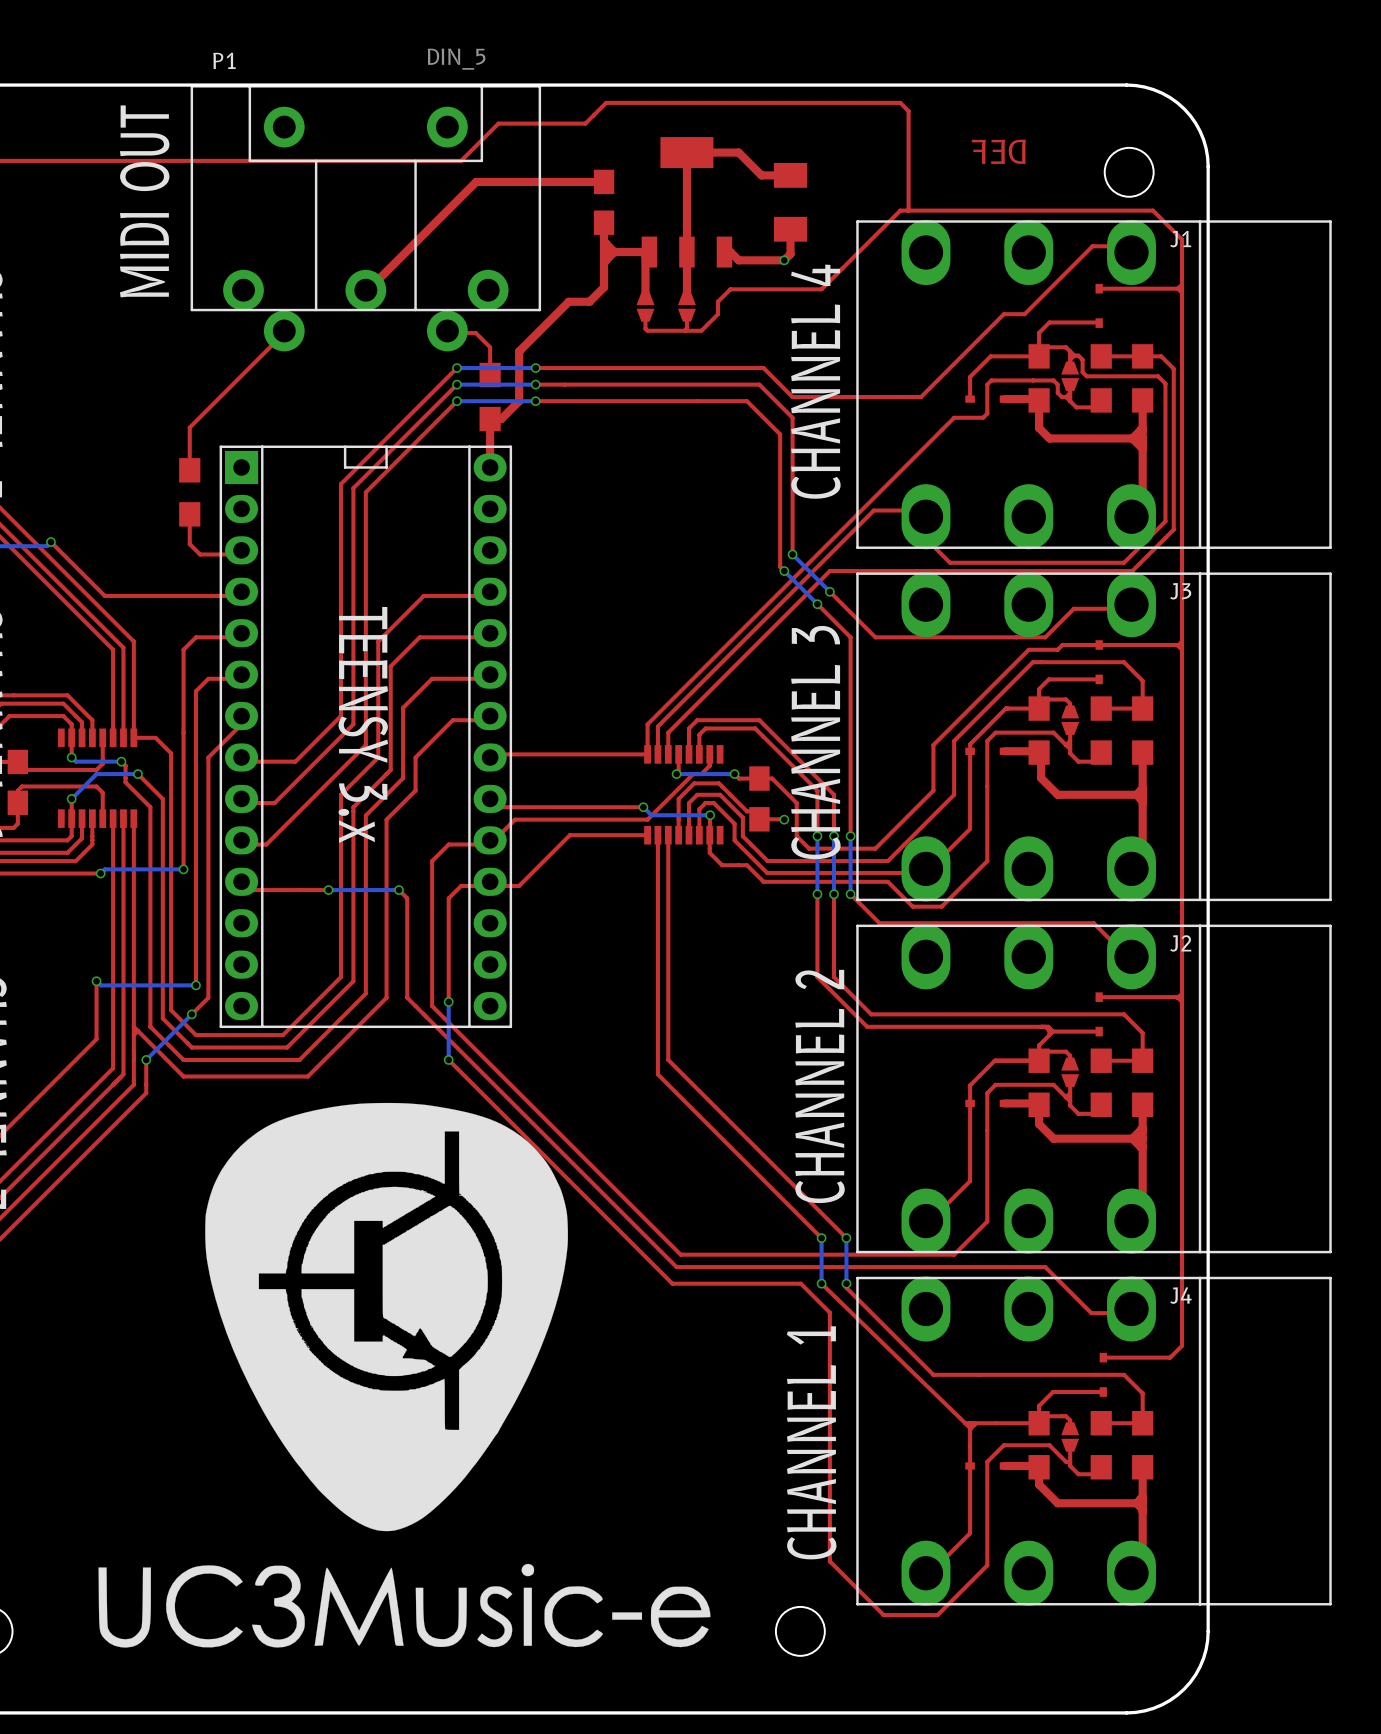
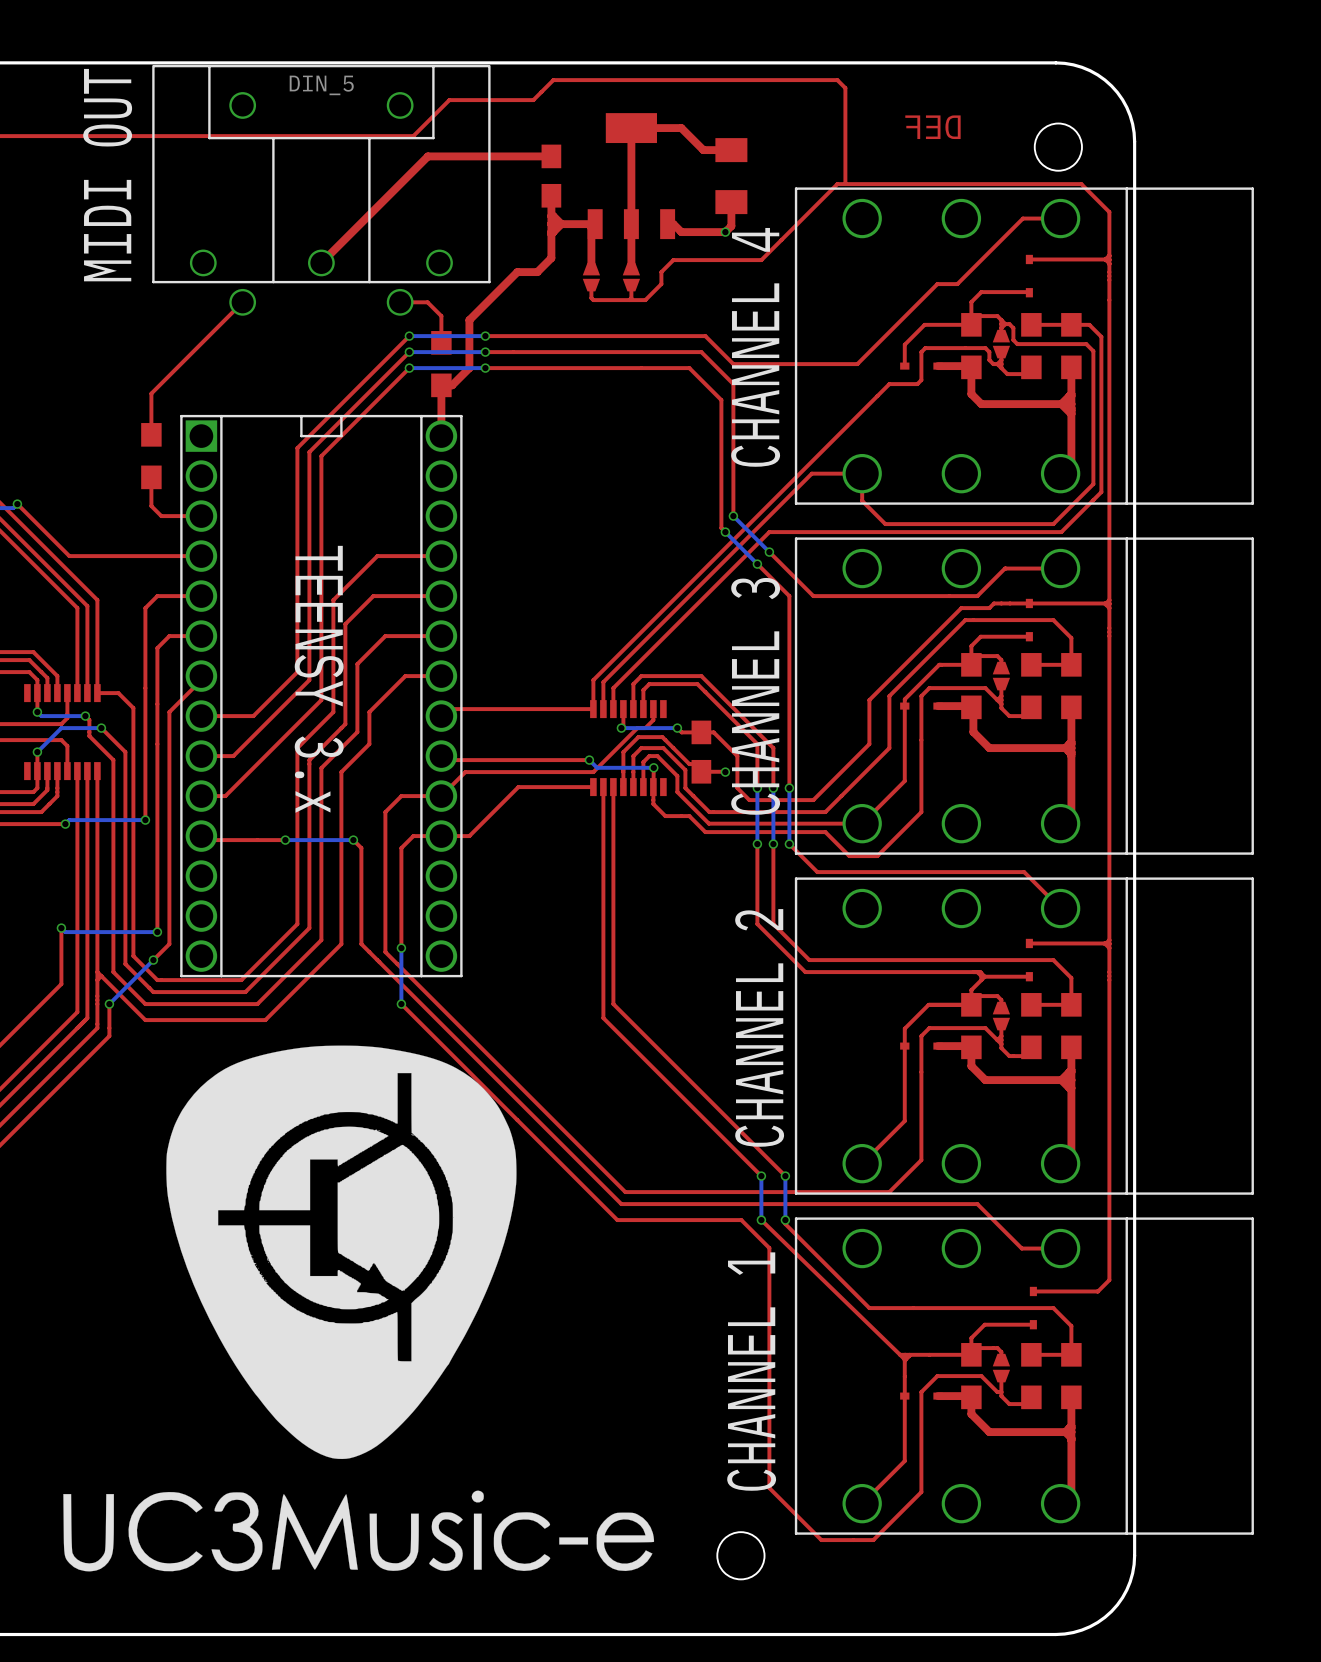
part: none -> DIN_5 (321, 190)
P1: DIN_5 (365, 218) -> none
part: none -> (1024, 346)
J1: (1093, 384) -> none
part footprint: [219, 445, 513, 1029] -> [180, 414, 463, 978]
J3: (1093, 736) -> none
part: none -> (1024, 696)
J2: (1093, 1088) -> none
part: none -> (1024, 1036)
J4: (1093, 1441) -> none
part: none -> (1024, 1376)

